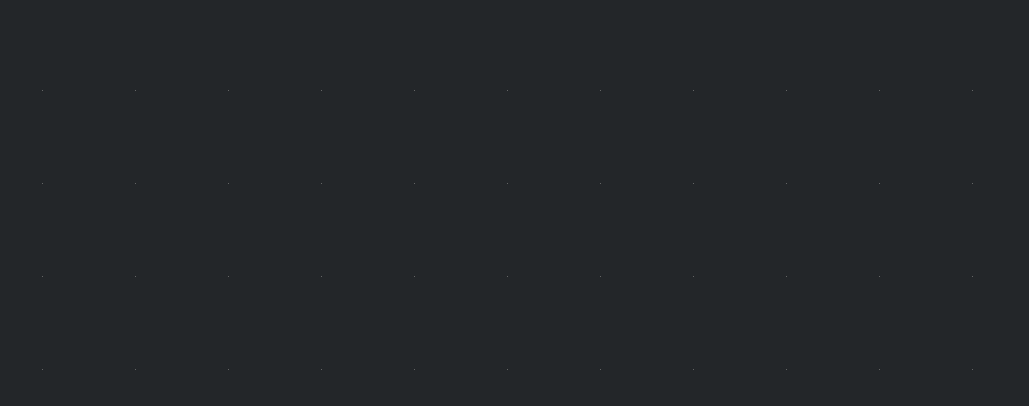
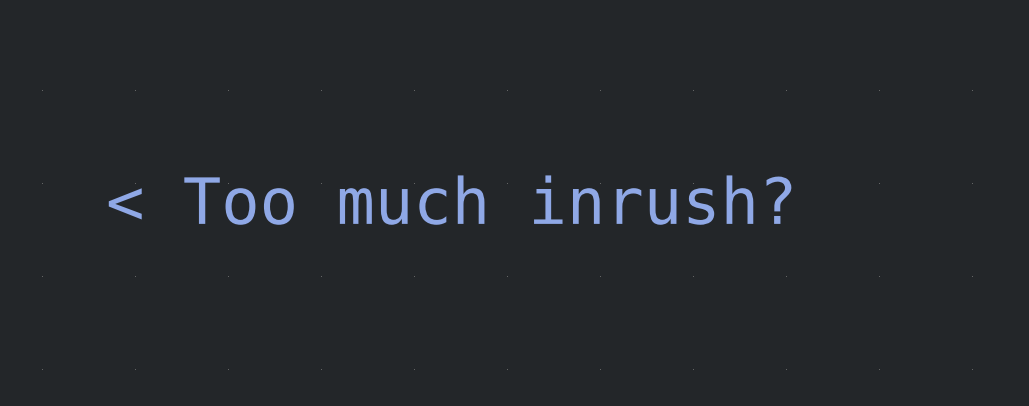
text: none -> < Too much inrush? (450, 200)

